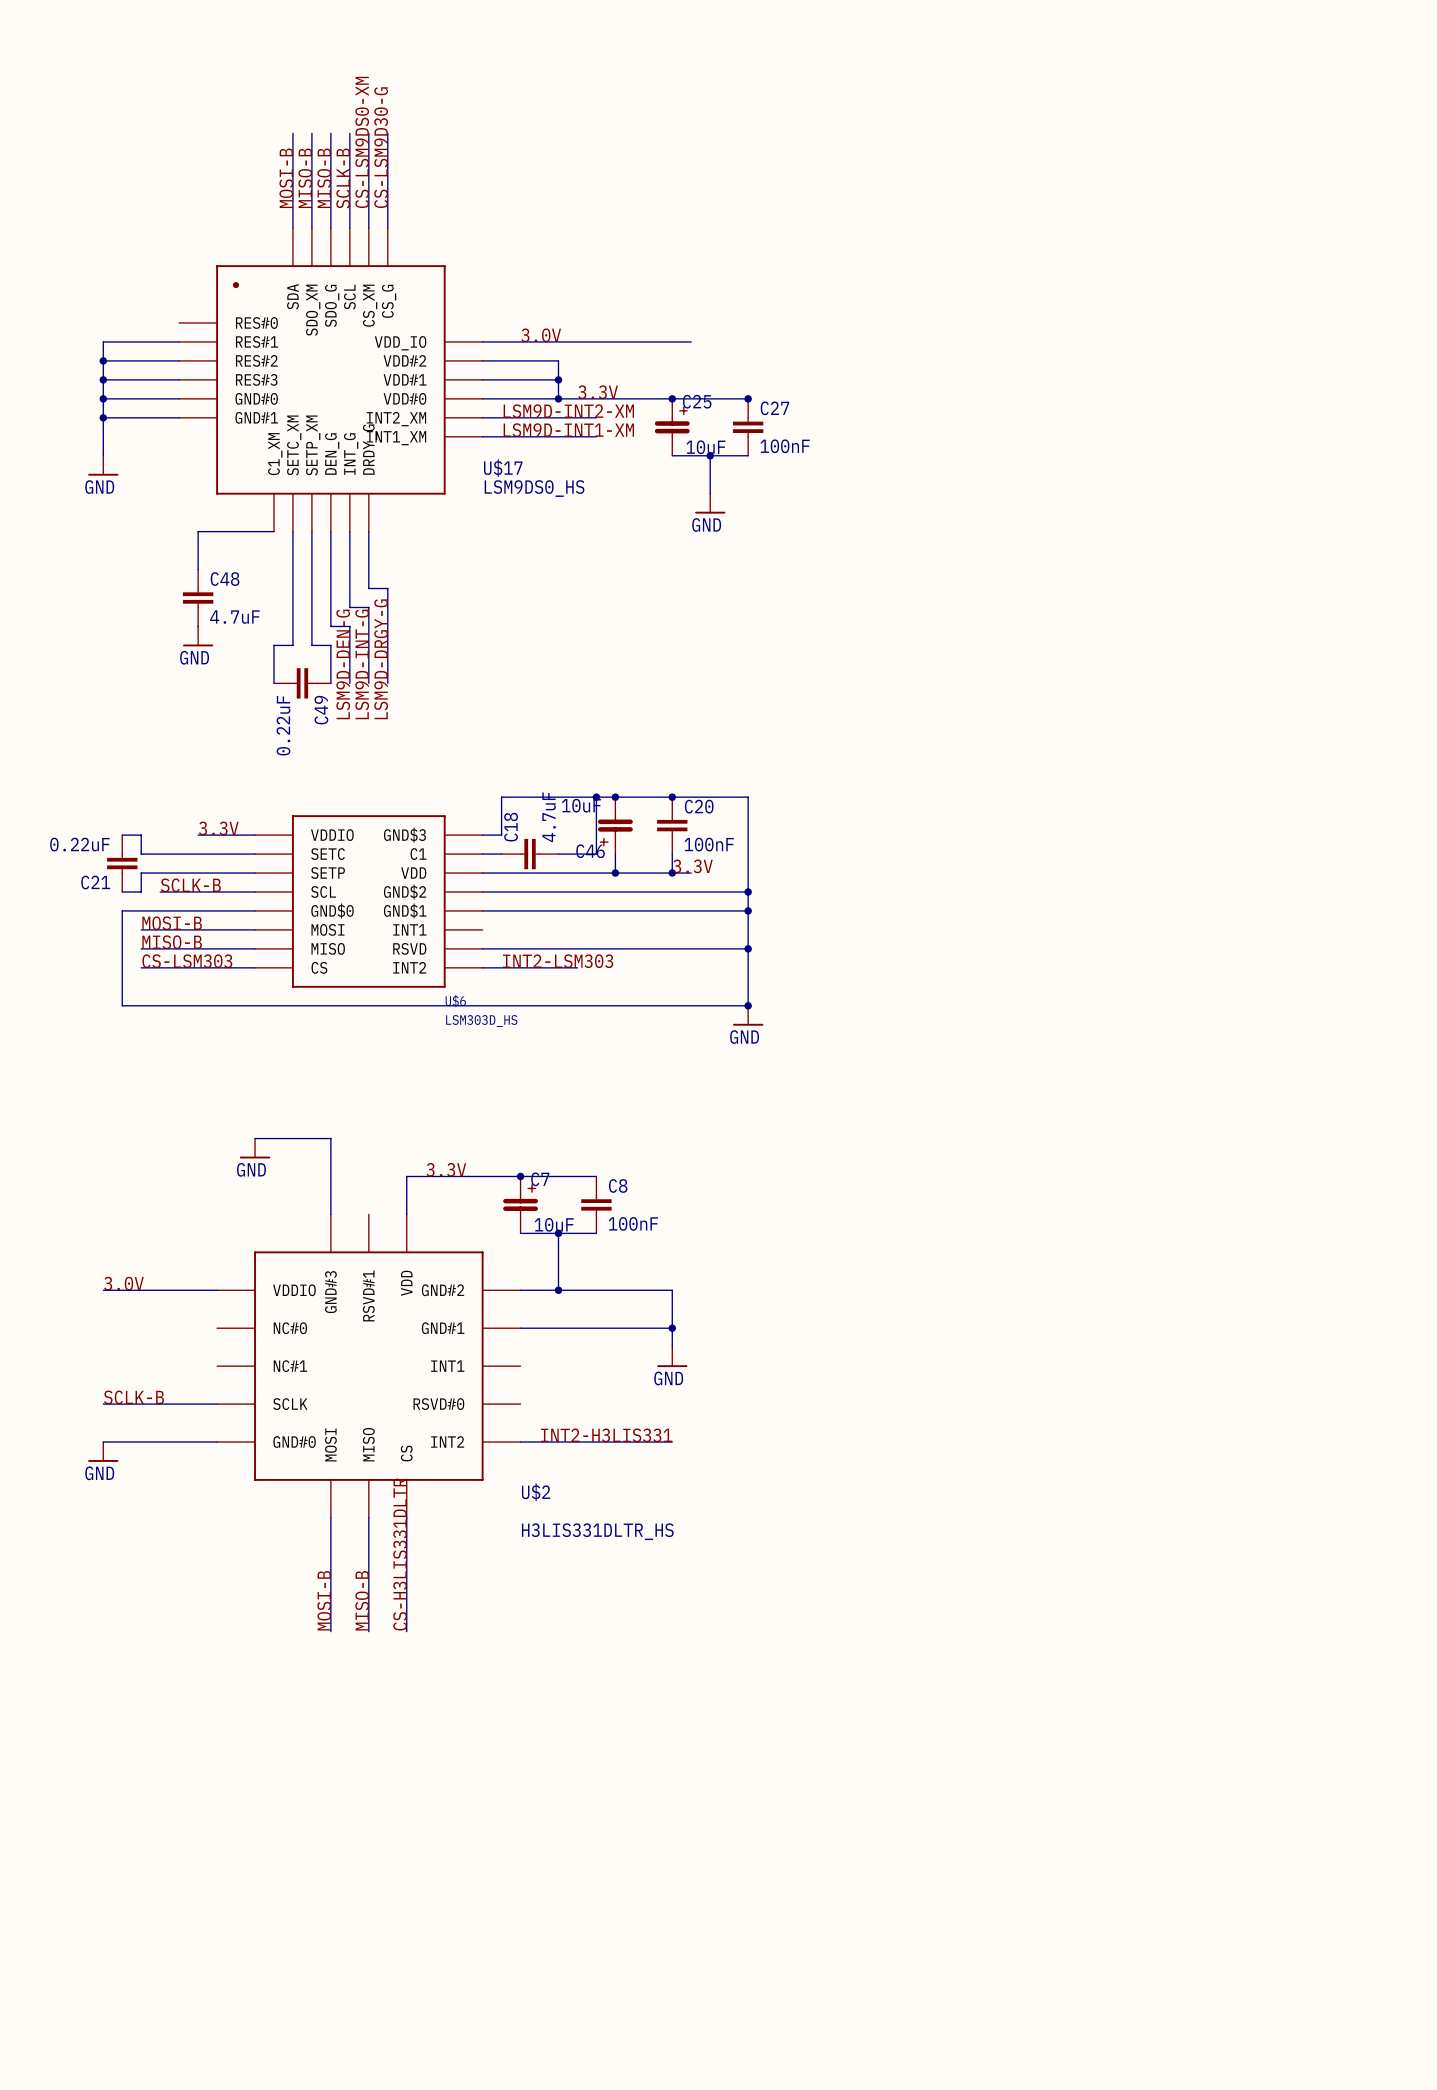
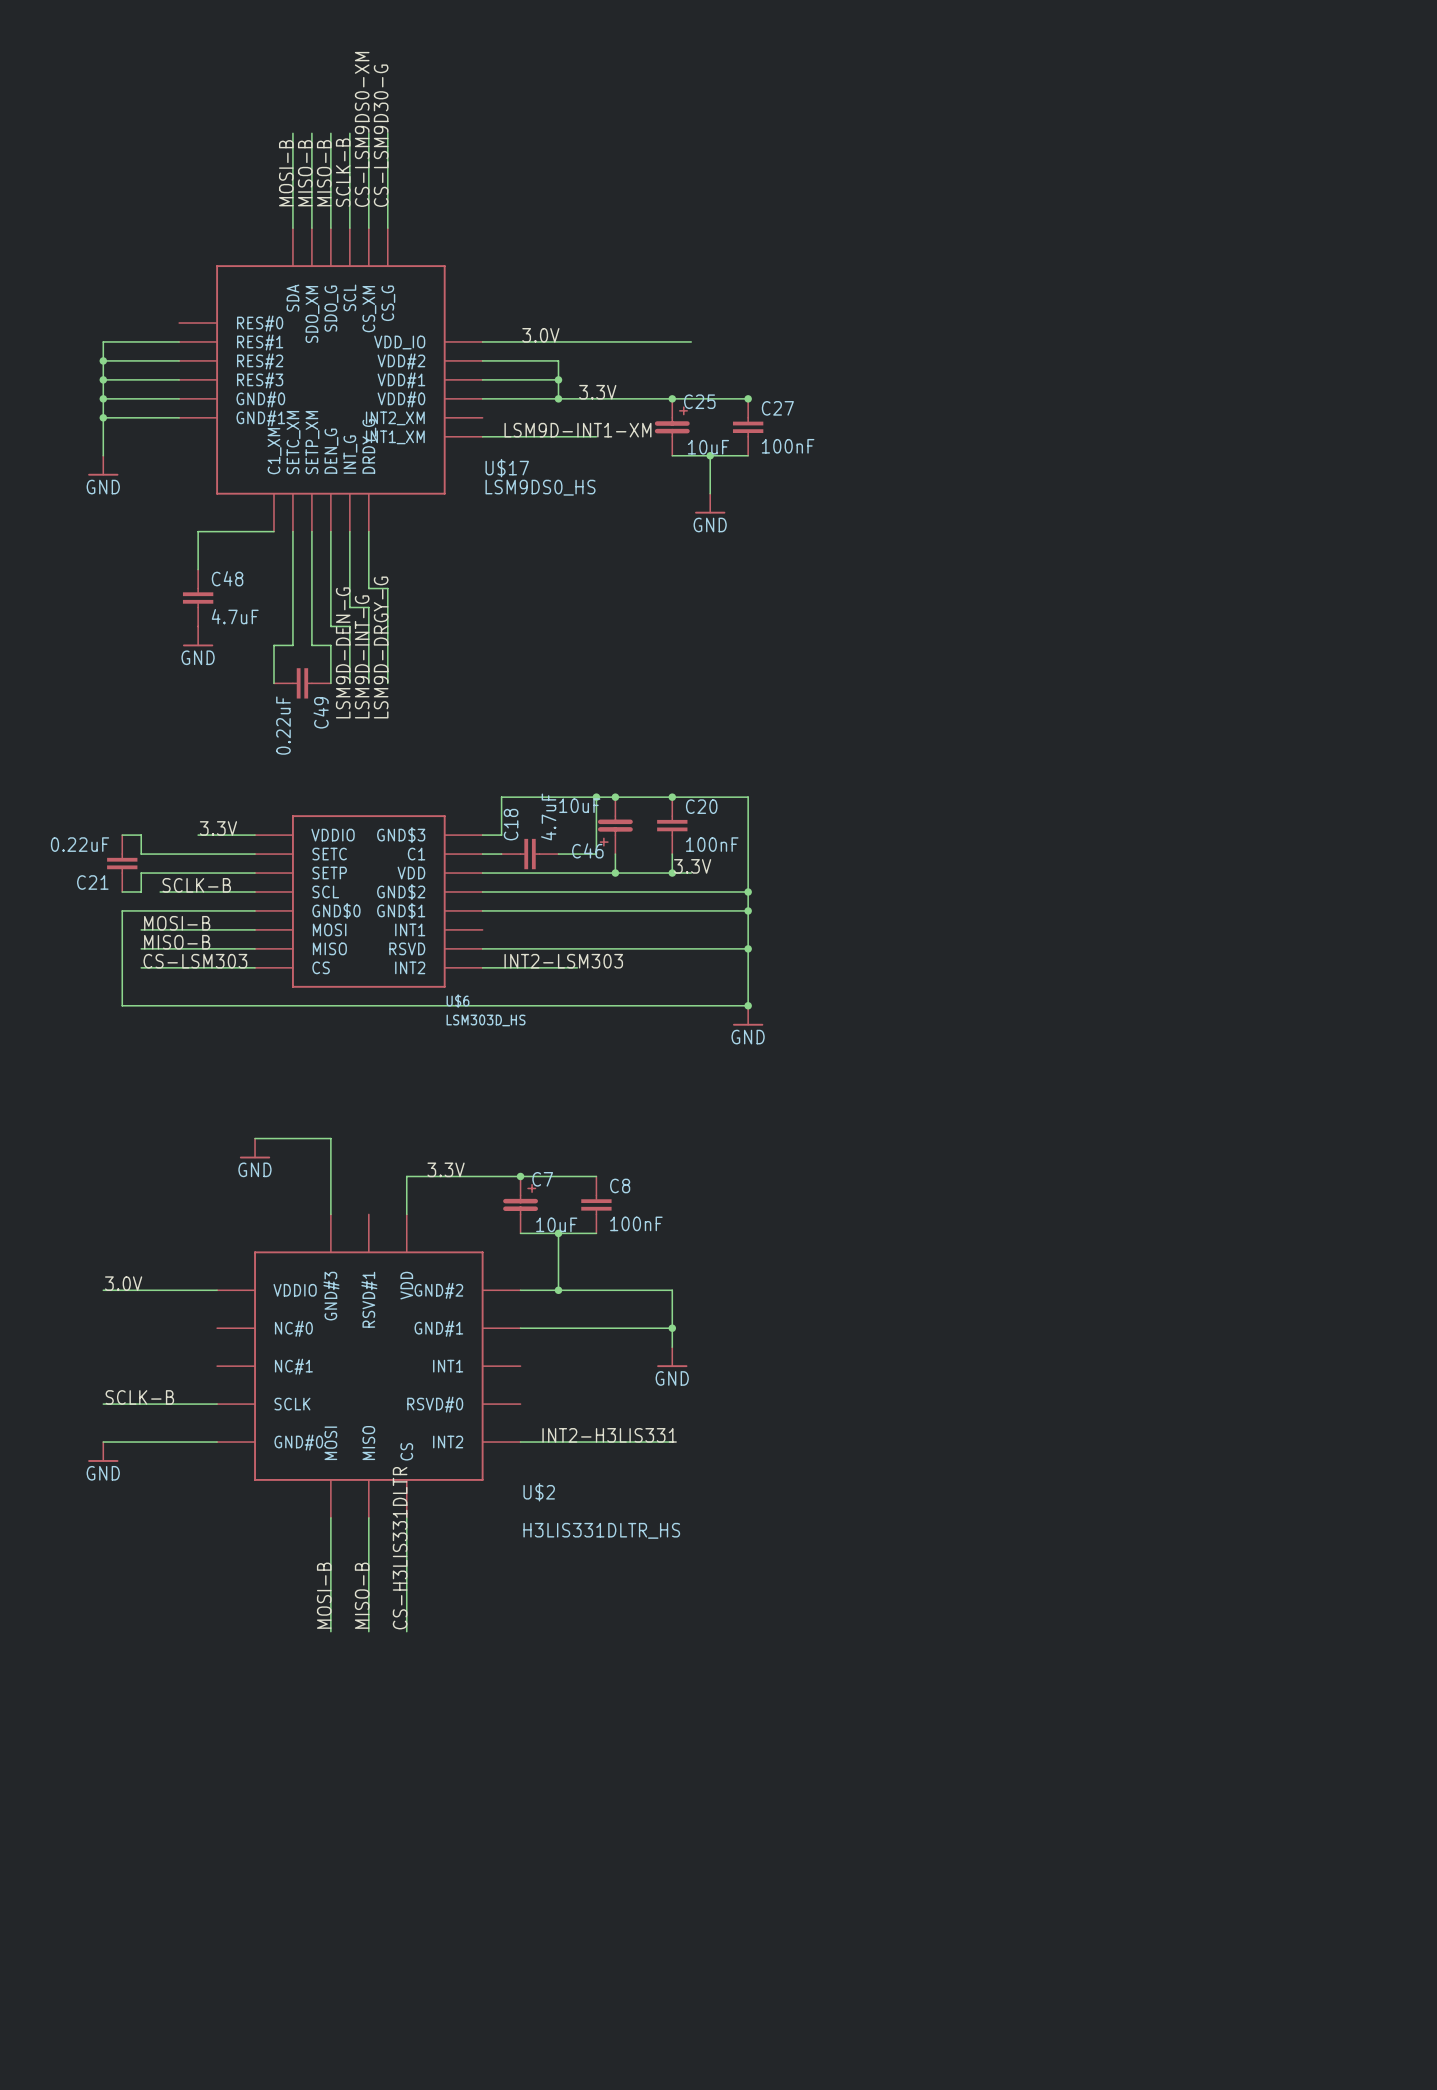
U$17 symbol: [179, 228, 483, 532] -> [179, 228, 483, 532]
label: LSM9D-INT2-XM (568, 411) -> none
wire: (482, 417) (596, 417) -> none

